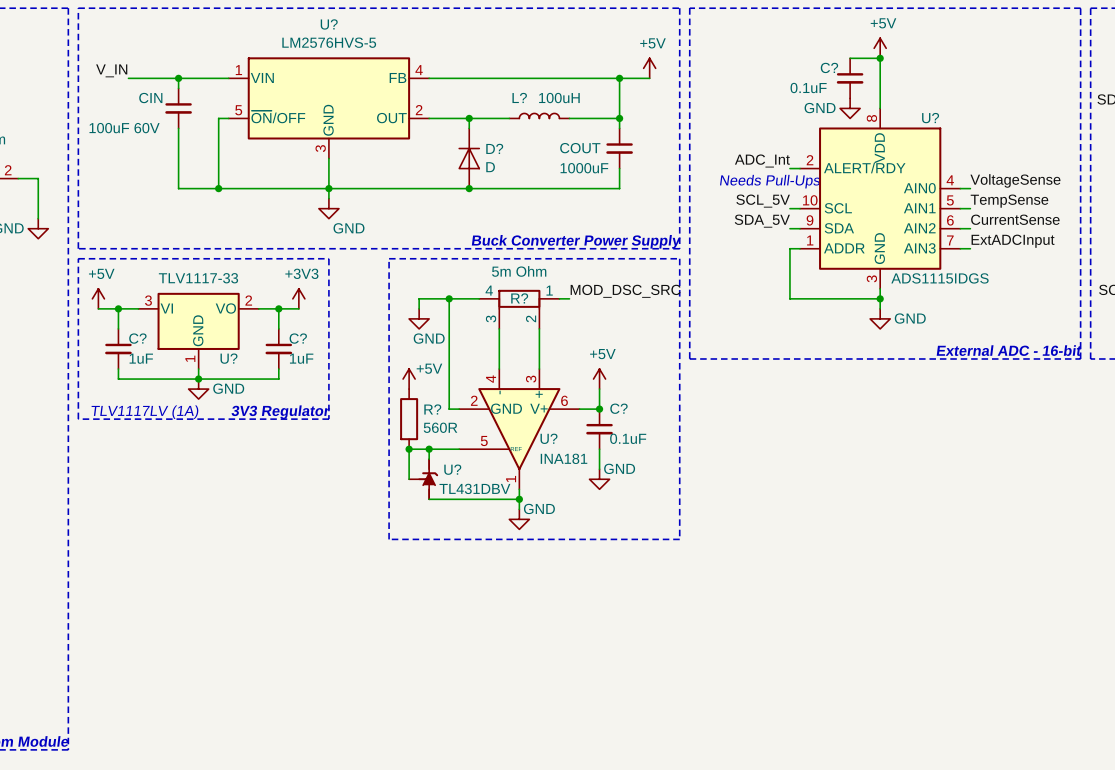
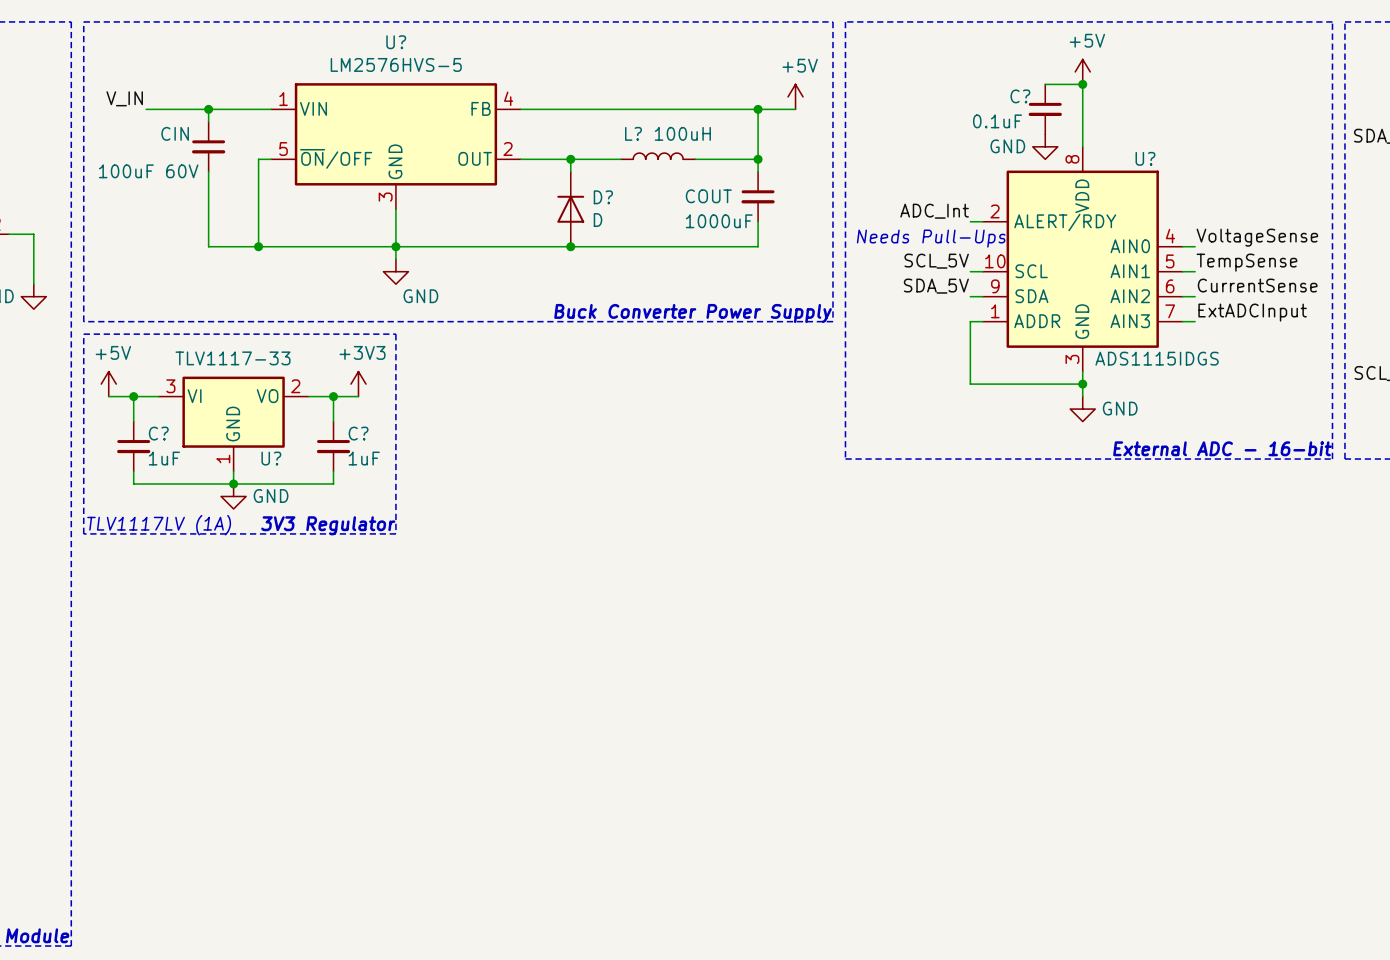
line: (389, 258) (679, 258) (679, 539) (389, 539) (389, 258) -> none
label: MOD_DSC_SRC (625, 291) -> none
wire: (449, 298) (449, 409) (459, 409) -> none
junction: (449, 298) -> none
wire: (479, 298) (419, 298) (419, 308) -> none
wire: (559, 298) (569, 298) -> none
R?: 5m Ohm (519, 309) -> none
power symbol: GND (419, 318) -> none
wire: (499, 328) (499, 369) -> none
wire: (539, 328) (539, 369) -> none
power symbol: +5V (409, 379) -> none
power symbol: +5V (599, 379) -> none
wire: (599, 389) (599, 409) (579, 409) -> none
junction: (599, 409) -> none
R?: 560R (409, 419) -> none
U?: INA181 (519, 429) -> none
C?: 0.1uF (599, 429) -> none
junction: (409, 449) -> none
wire: (429, 449) (429, 459) -> none
junction: (429, 449) -> none
wire: (459, 449) (409, 449) (409, 479) -> none
wire: (599, 449) (599, 469) -> none
U?: TL431DBV (423, 479) -> none
power symbol: GND (599, 479) -> none
wire: (519, 489) (519, 509) -> none
wire: (429, 499) (519, 499) -> none
junction: (519, 499) -> none
power symbol: GND (519, 519) -> none

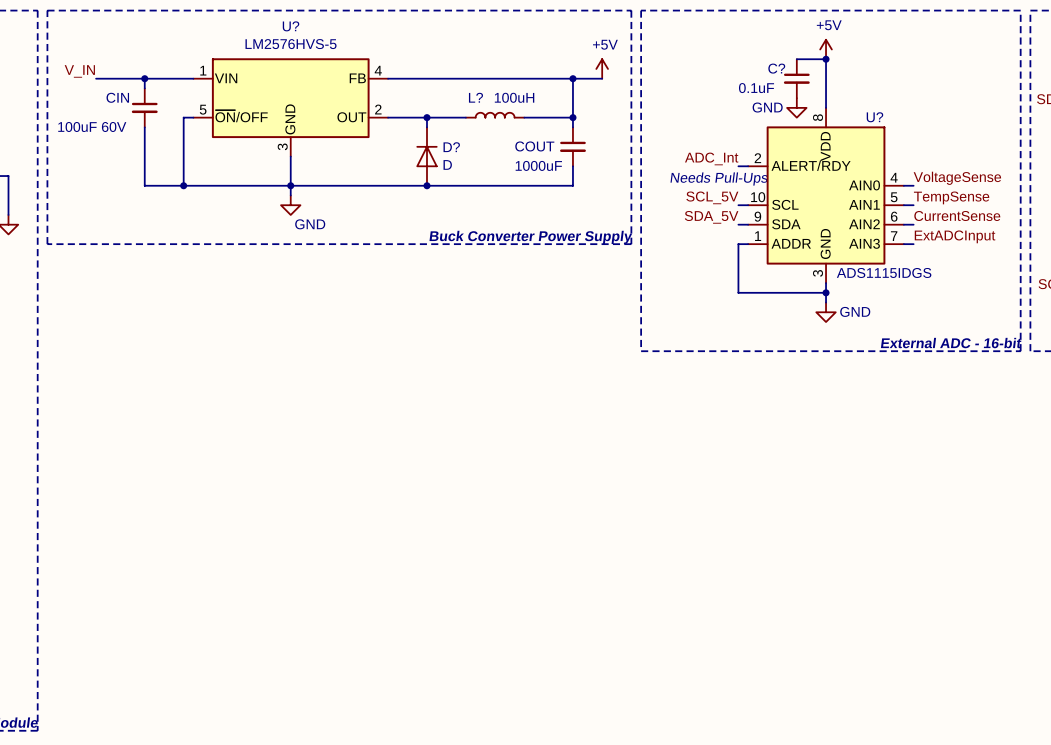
line: (83, 334) (395, 334) (395, 533) (83, 533) (83, 334) -> none
power symbol: +5V (108, 384) -> none
power symbol: +3V3 (358, 384) -> none
wire: (108, 396) (158, 396) -> none
wire: (133, 396) (133, 421) -> none
junction: (133, 396) -> none
wire: (308, 396) (358, 396) -> none
wire: (333, 396) (333, 421) -> none
junction: (333, 396) -> none
U?: TLV1117-33 (233, 424) -> none
C?: 1uF (133, 446) -> none
C?: 1uF (333, 446) -> none
wire: (133, 471) (133, 483) (333, 483) (333, 471) -> none
wire: (233, 471) (233, 483) -> none
junction: (233, 483) -> none
power symbol: GND (233, 496) -> none
text: TLV1117LV (1A) (159, 525) -> none
text: 3V3 Regulator (328, 525) -> none

